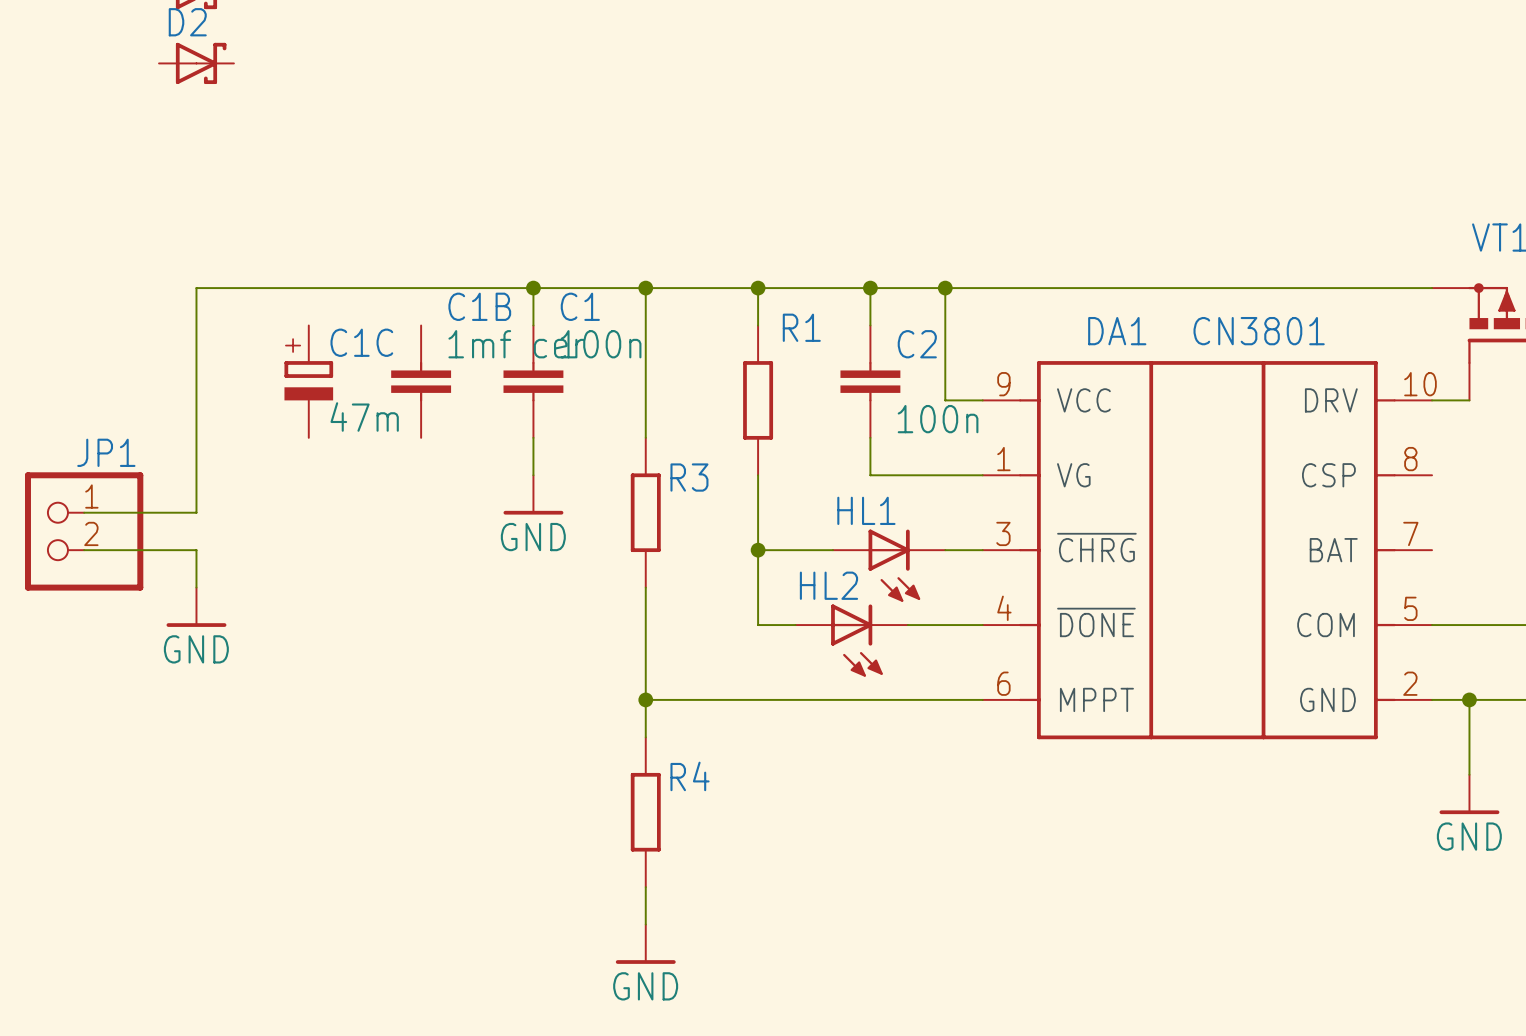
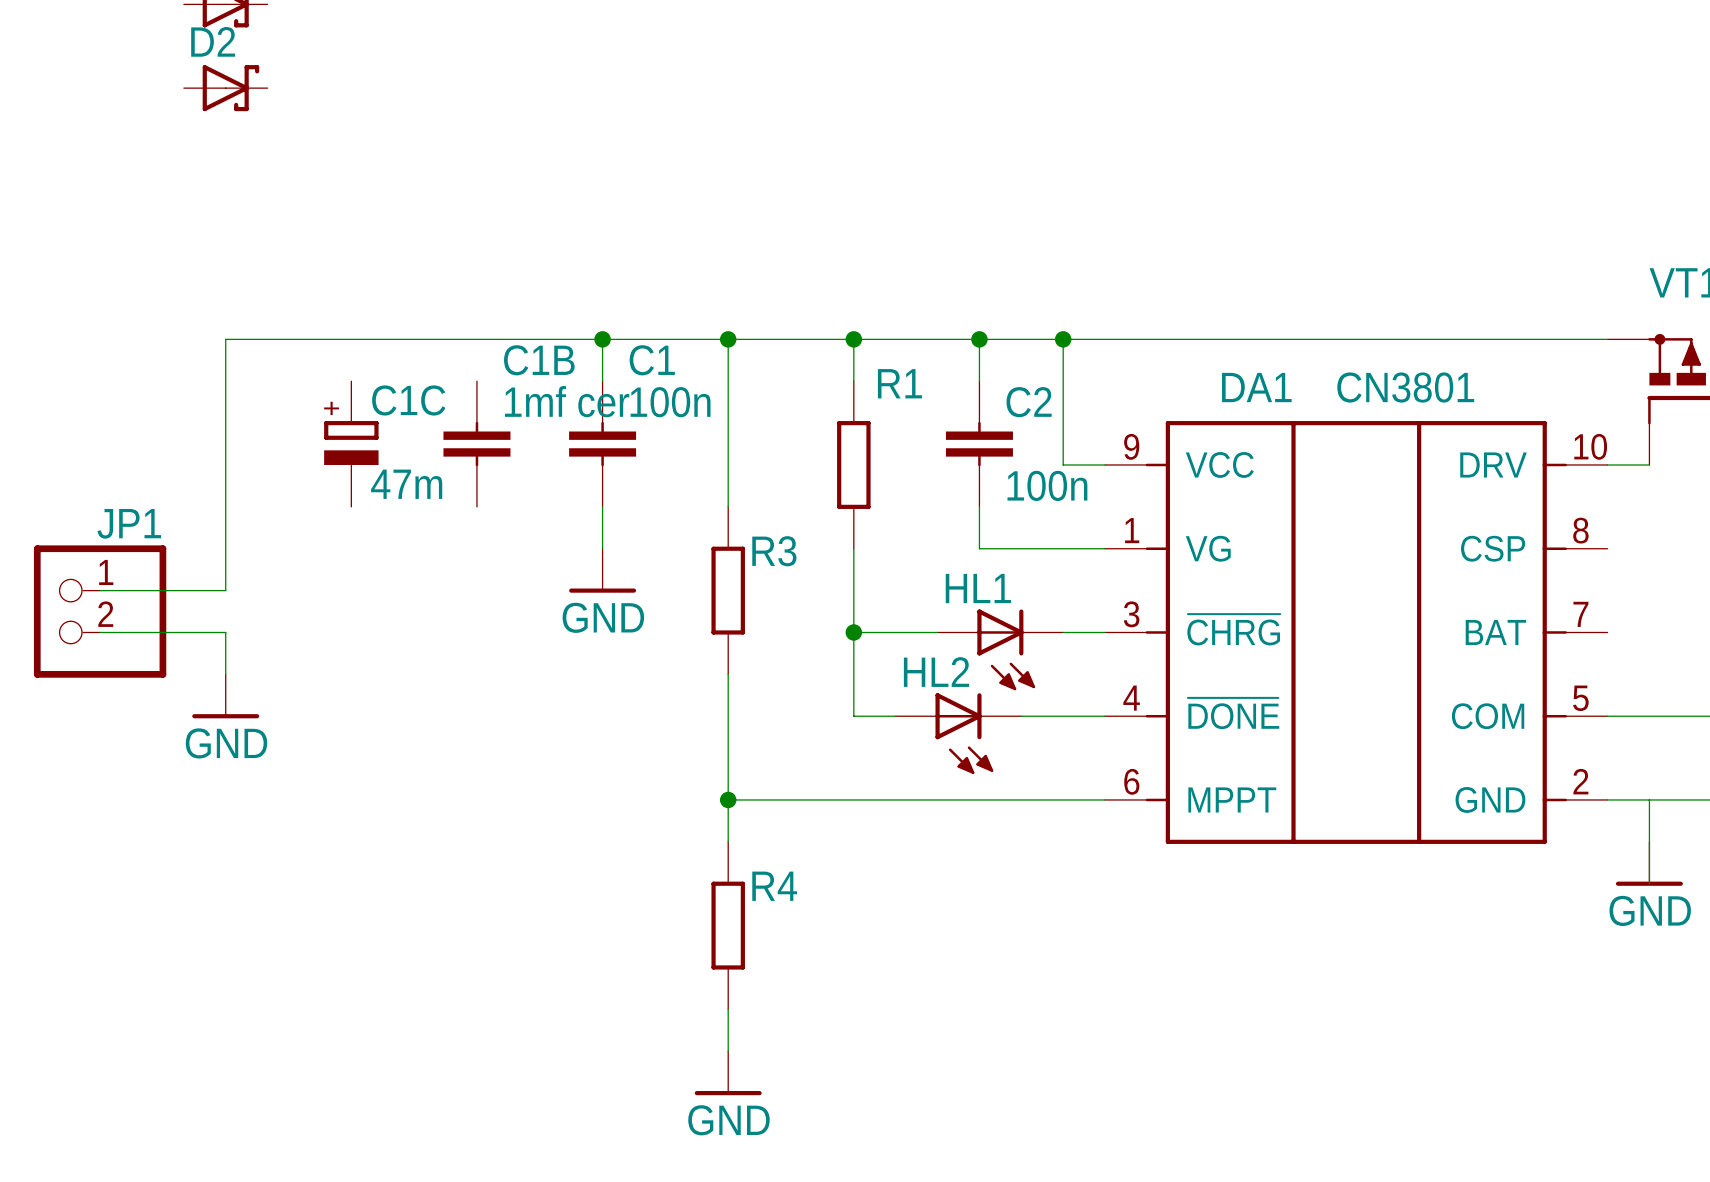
junction: (1469, 699) -> none
power symbol position: GND (1469, 794) -> GND (1649, 863)

